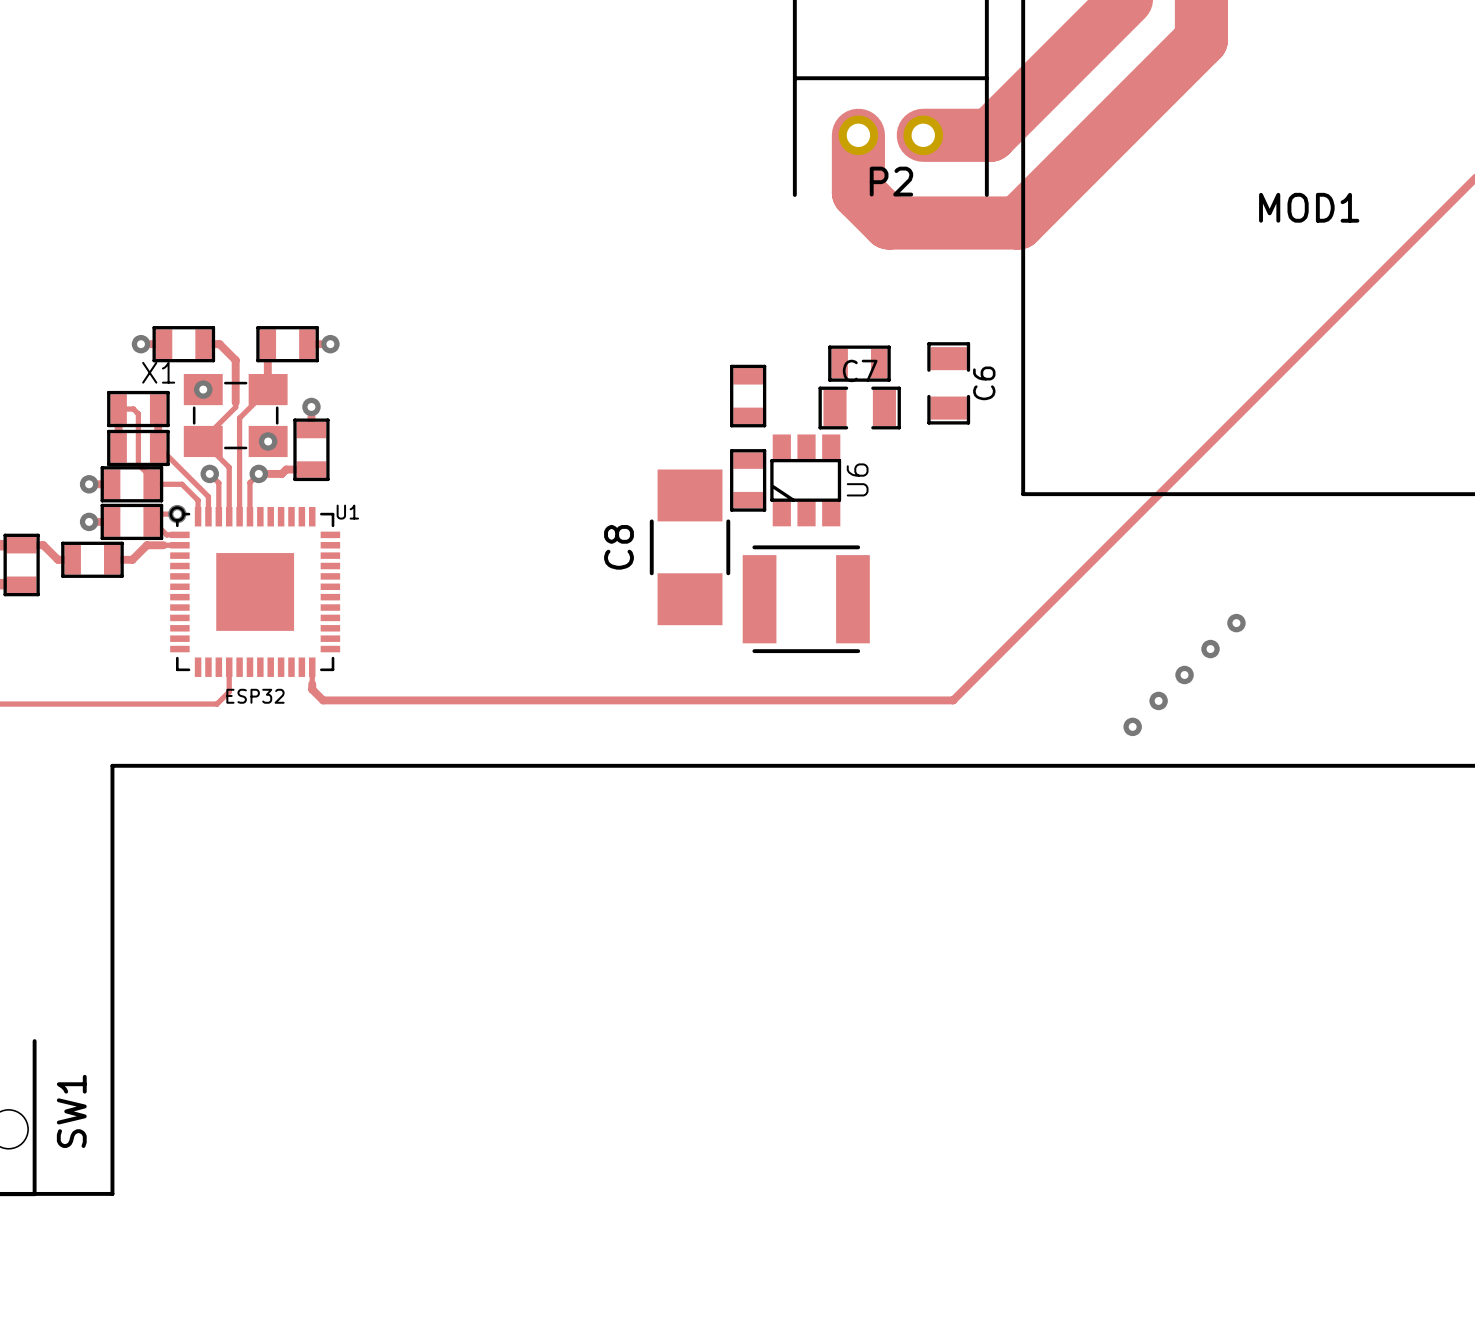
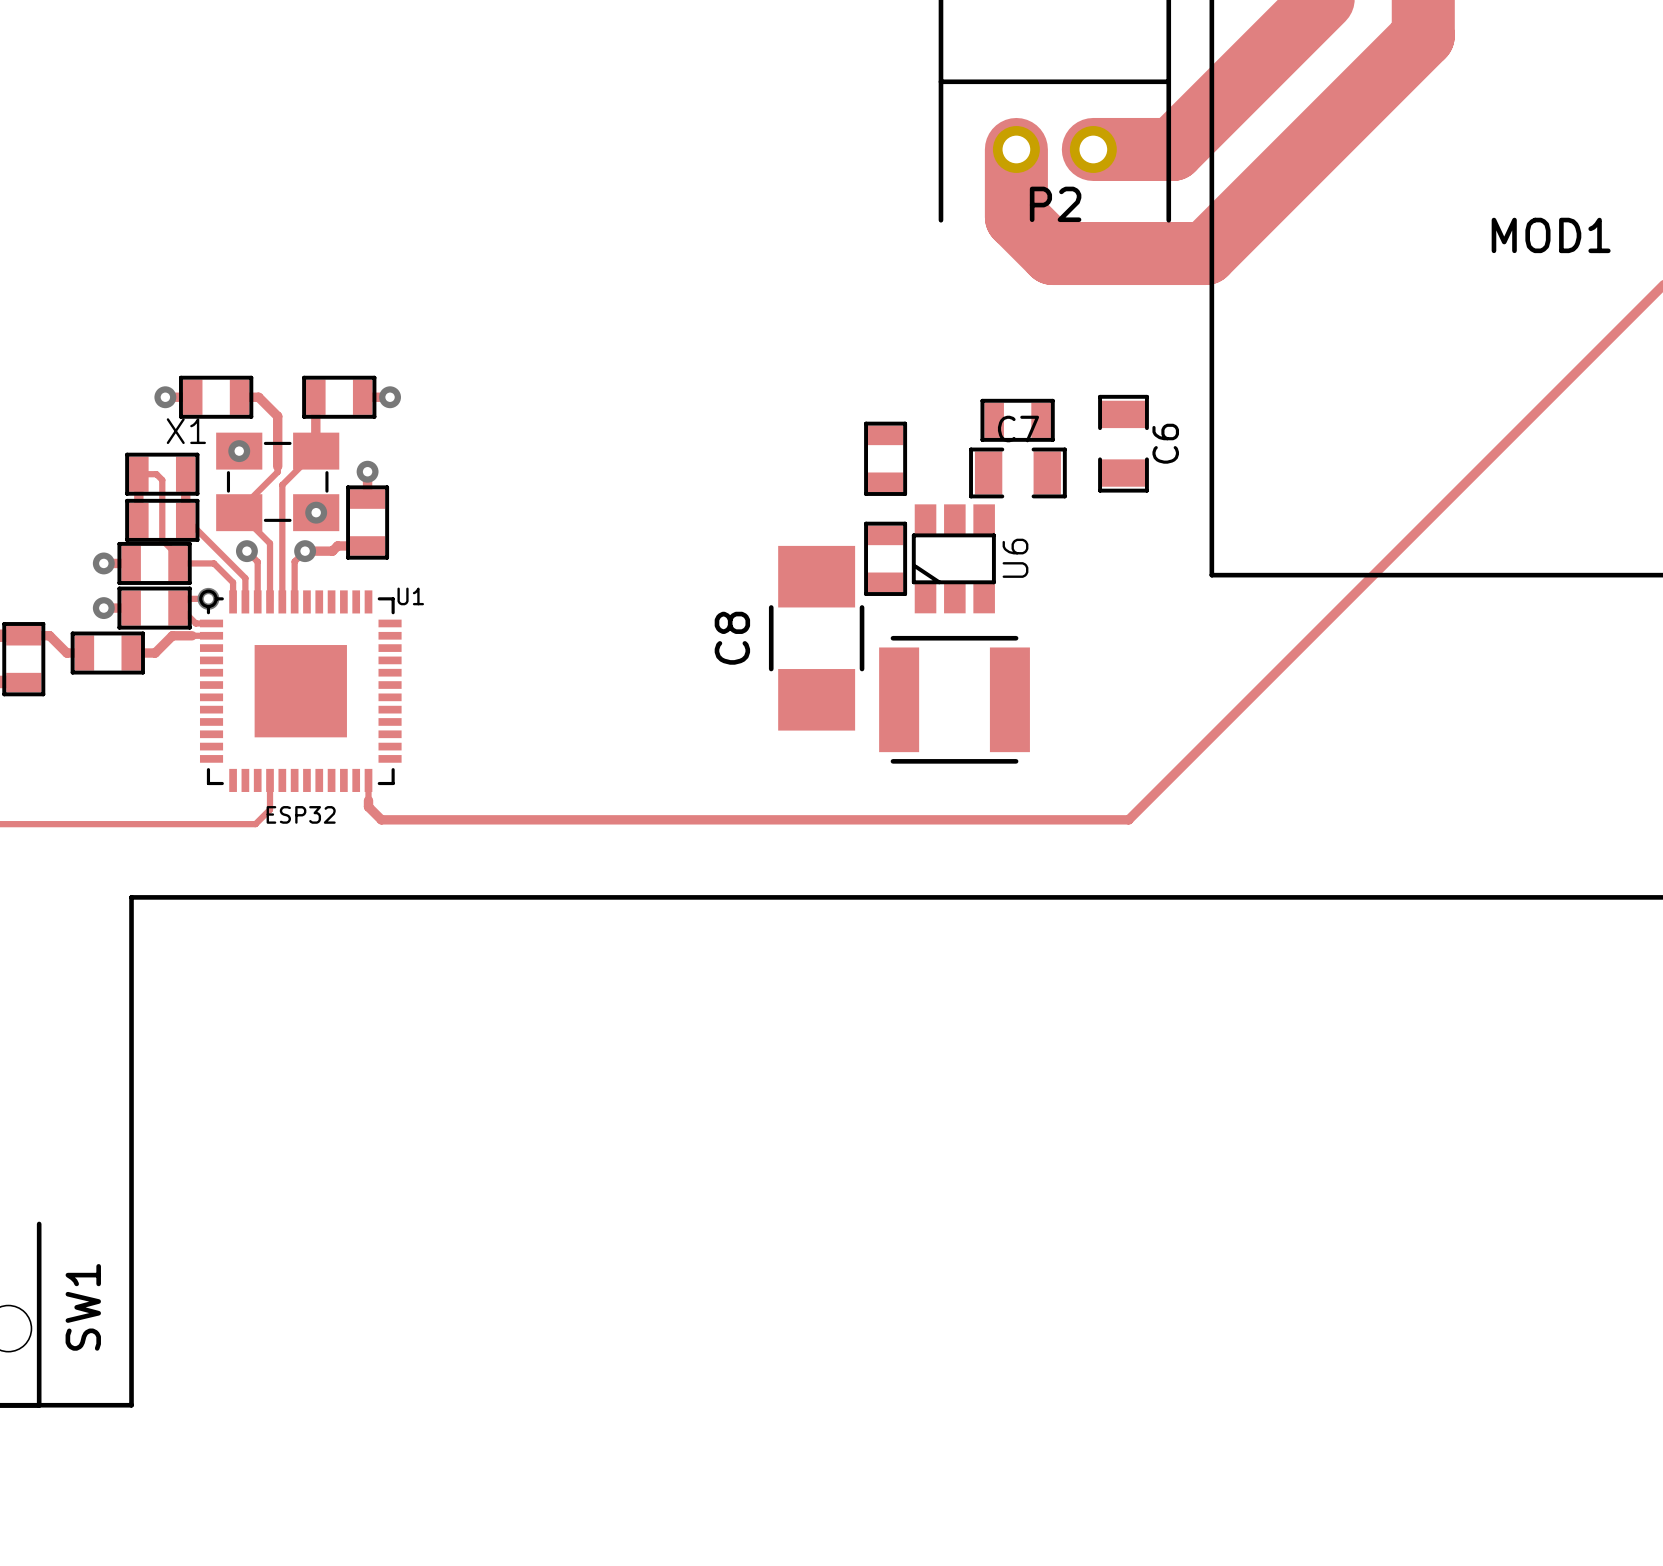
via: (1236, 623) -> none
via: (1210, 649) -> none
via: (1184, 674) -> none
via: (1158, 700) -> none
via: (1132, 726) -> none

